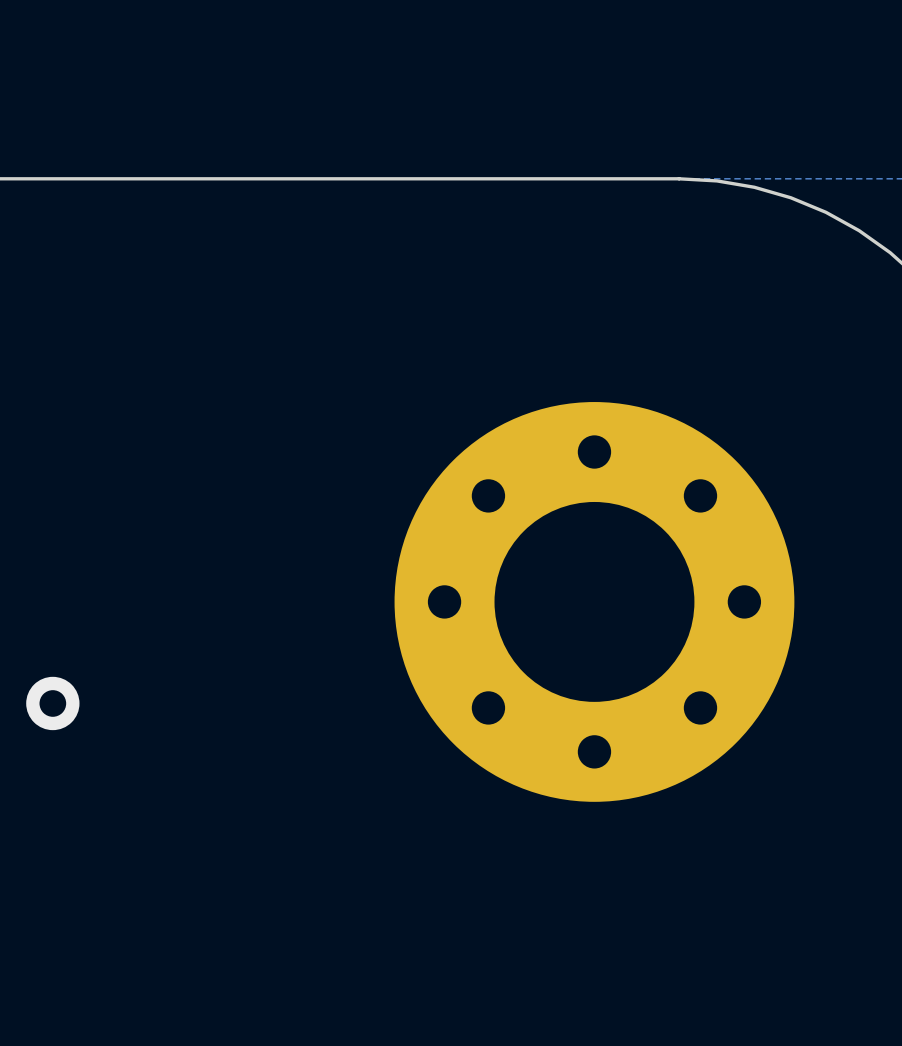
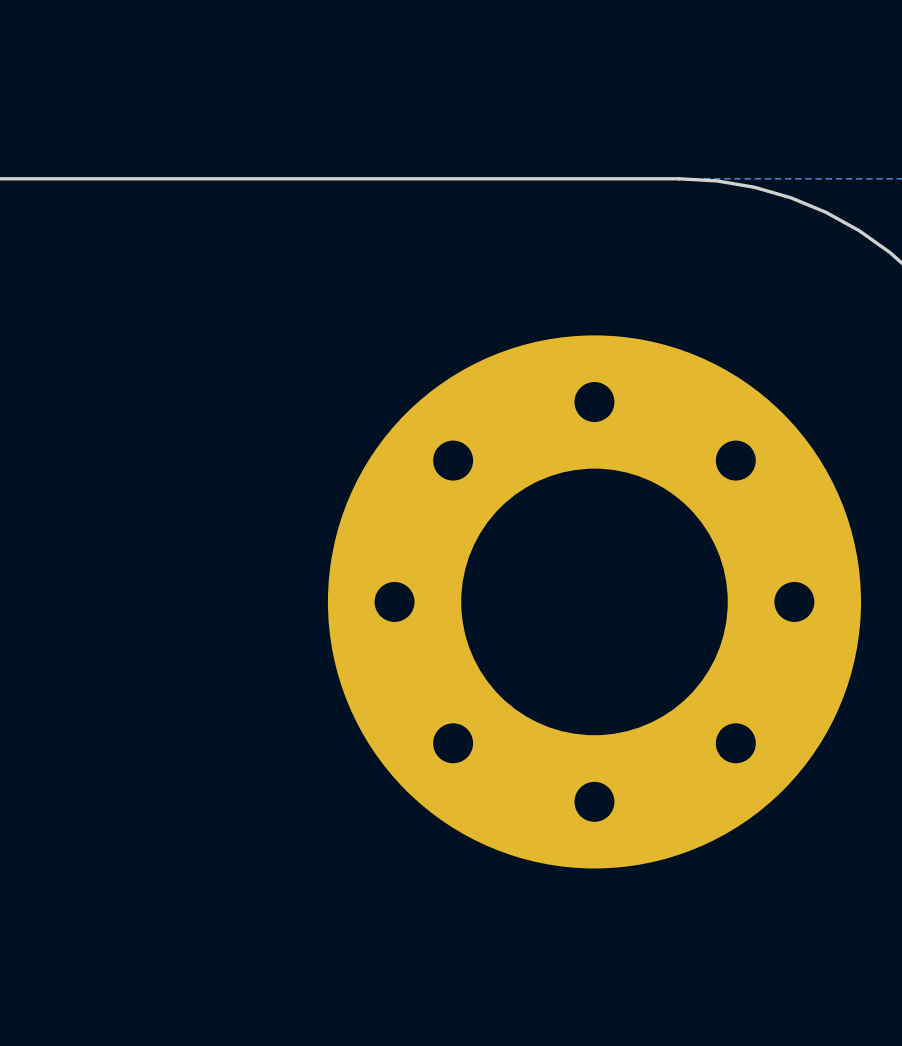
part footprint: [394, 402, 795, 802] -> [327, 335, 862, 869]
via: (52, 703) -> none

